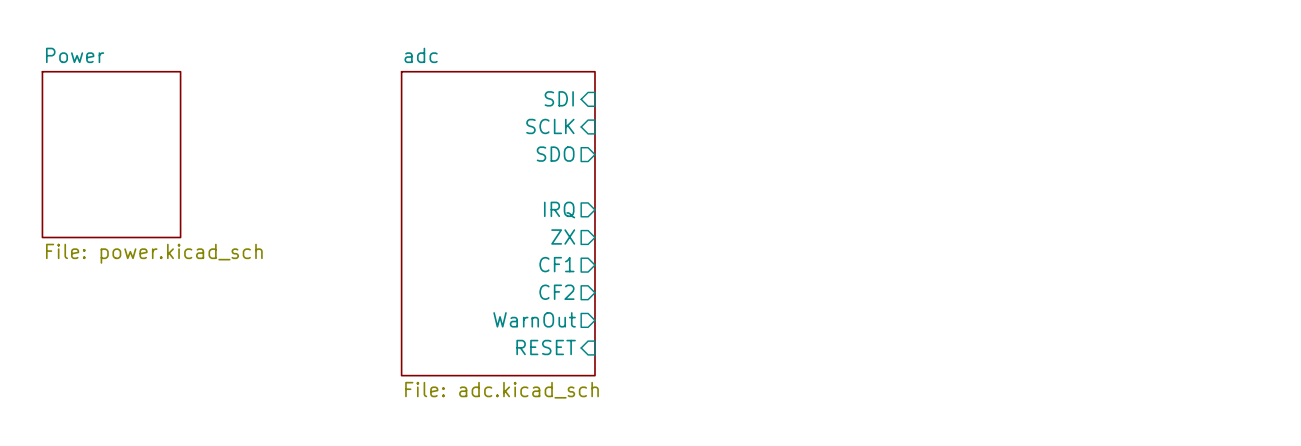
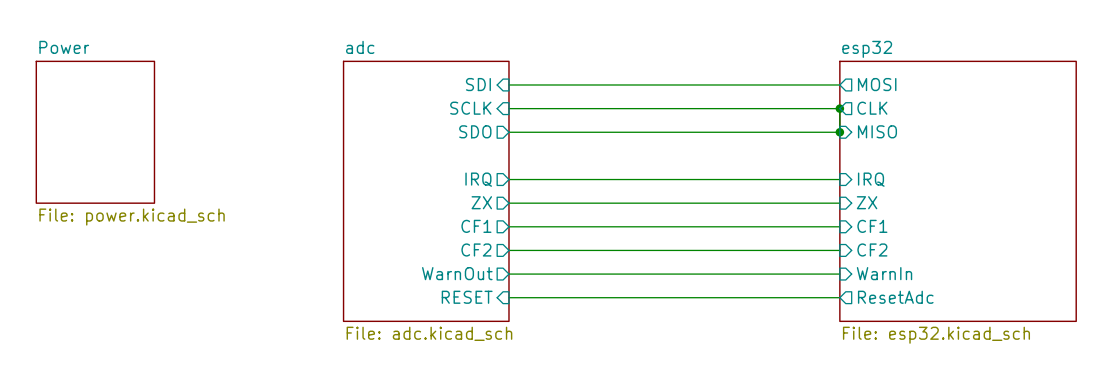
sheet pin: none -> MOSI (877, 84)
wire: none -> (508, 84) (839, 84)
wire: none -> (508, 108) (839, 108) (839, 132) (508, 132)
junction: none -> (839, 108)
sheet pin: none -> CLK (872, 108)
junction: none -> (839, 132)
sheet pin: none -> MISO (877, 131)
wire: none -> (508, 179) (839, 179)
sheet pin: none -> IRQ (871, 179)
sheet esp32: none -> File: esp32.kicad_sch (958, 191)
sheet pin: none -> ZX (867, 202)
wire: none -> (508, 203) (839, 203)
sheet pin: none -> CF1 (872, 226)
wire: none -> (508, 226) (839, 226)
wire: none -> (508, 250) (839, 250)
sheet pin: none -> CF2 (872, 249)
sheet pin: none -> WarnIn (884, 273)
wire: none -> (508, 274) (839, 274)
sheet pin: none -> ResetAdc (895, 297)
wire: none -> (508, 297) (839, 297)

